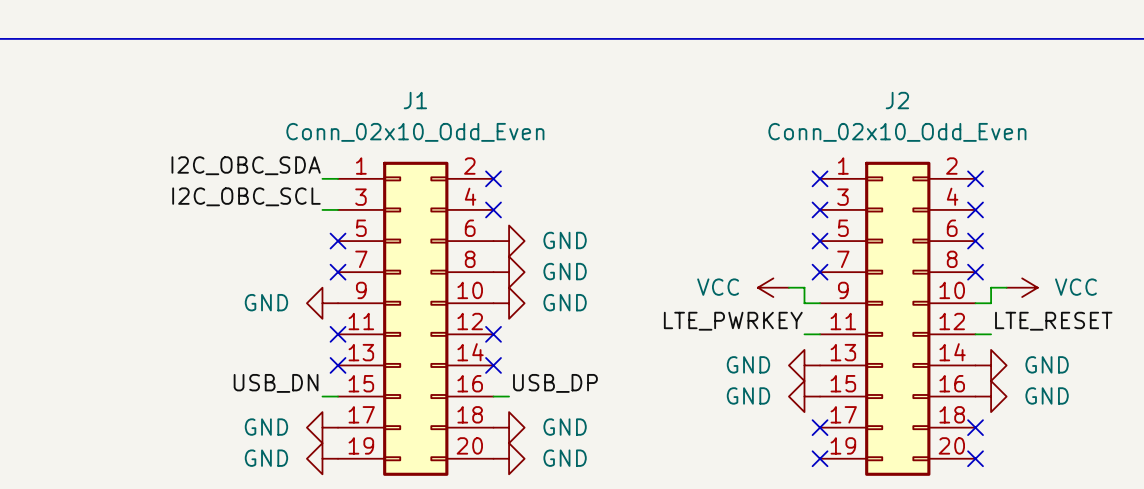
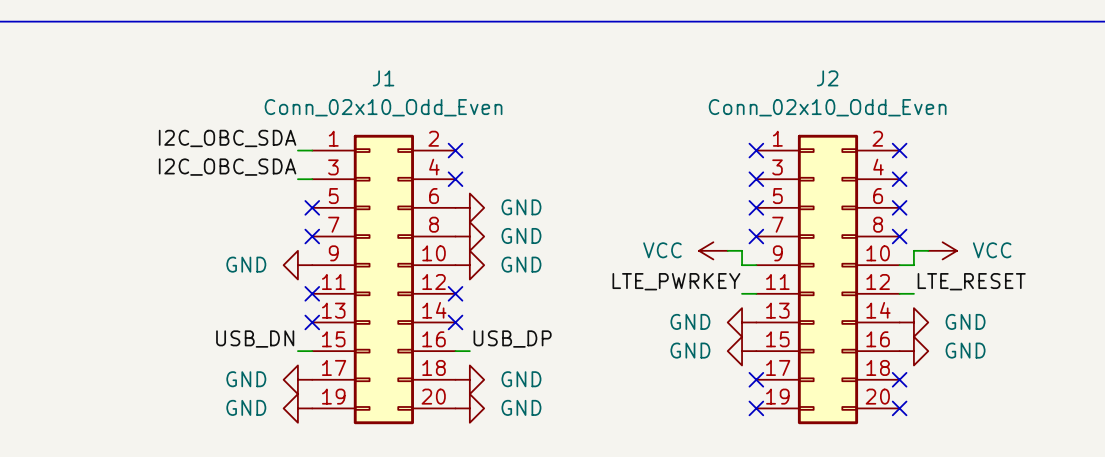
label: I2C_OBC_SCL (246, 196) -> I2C_OBC_SDA (227, 167)

